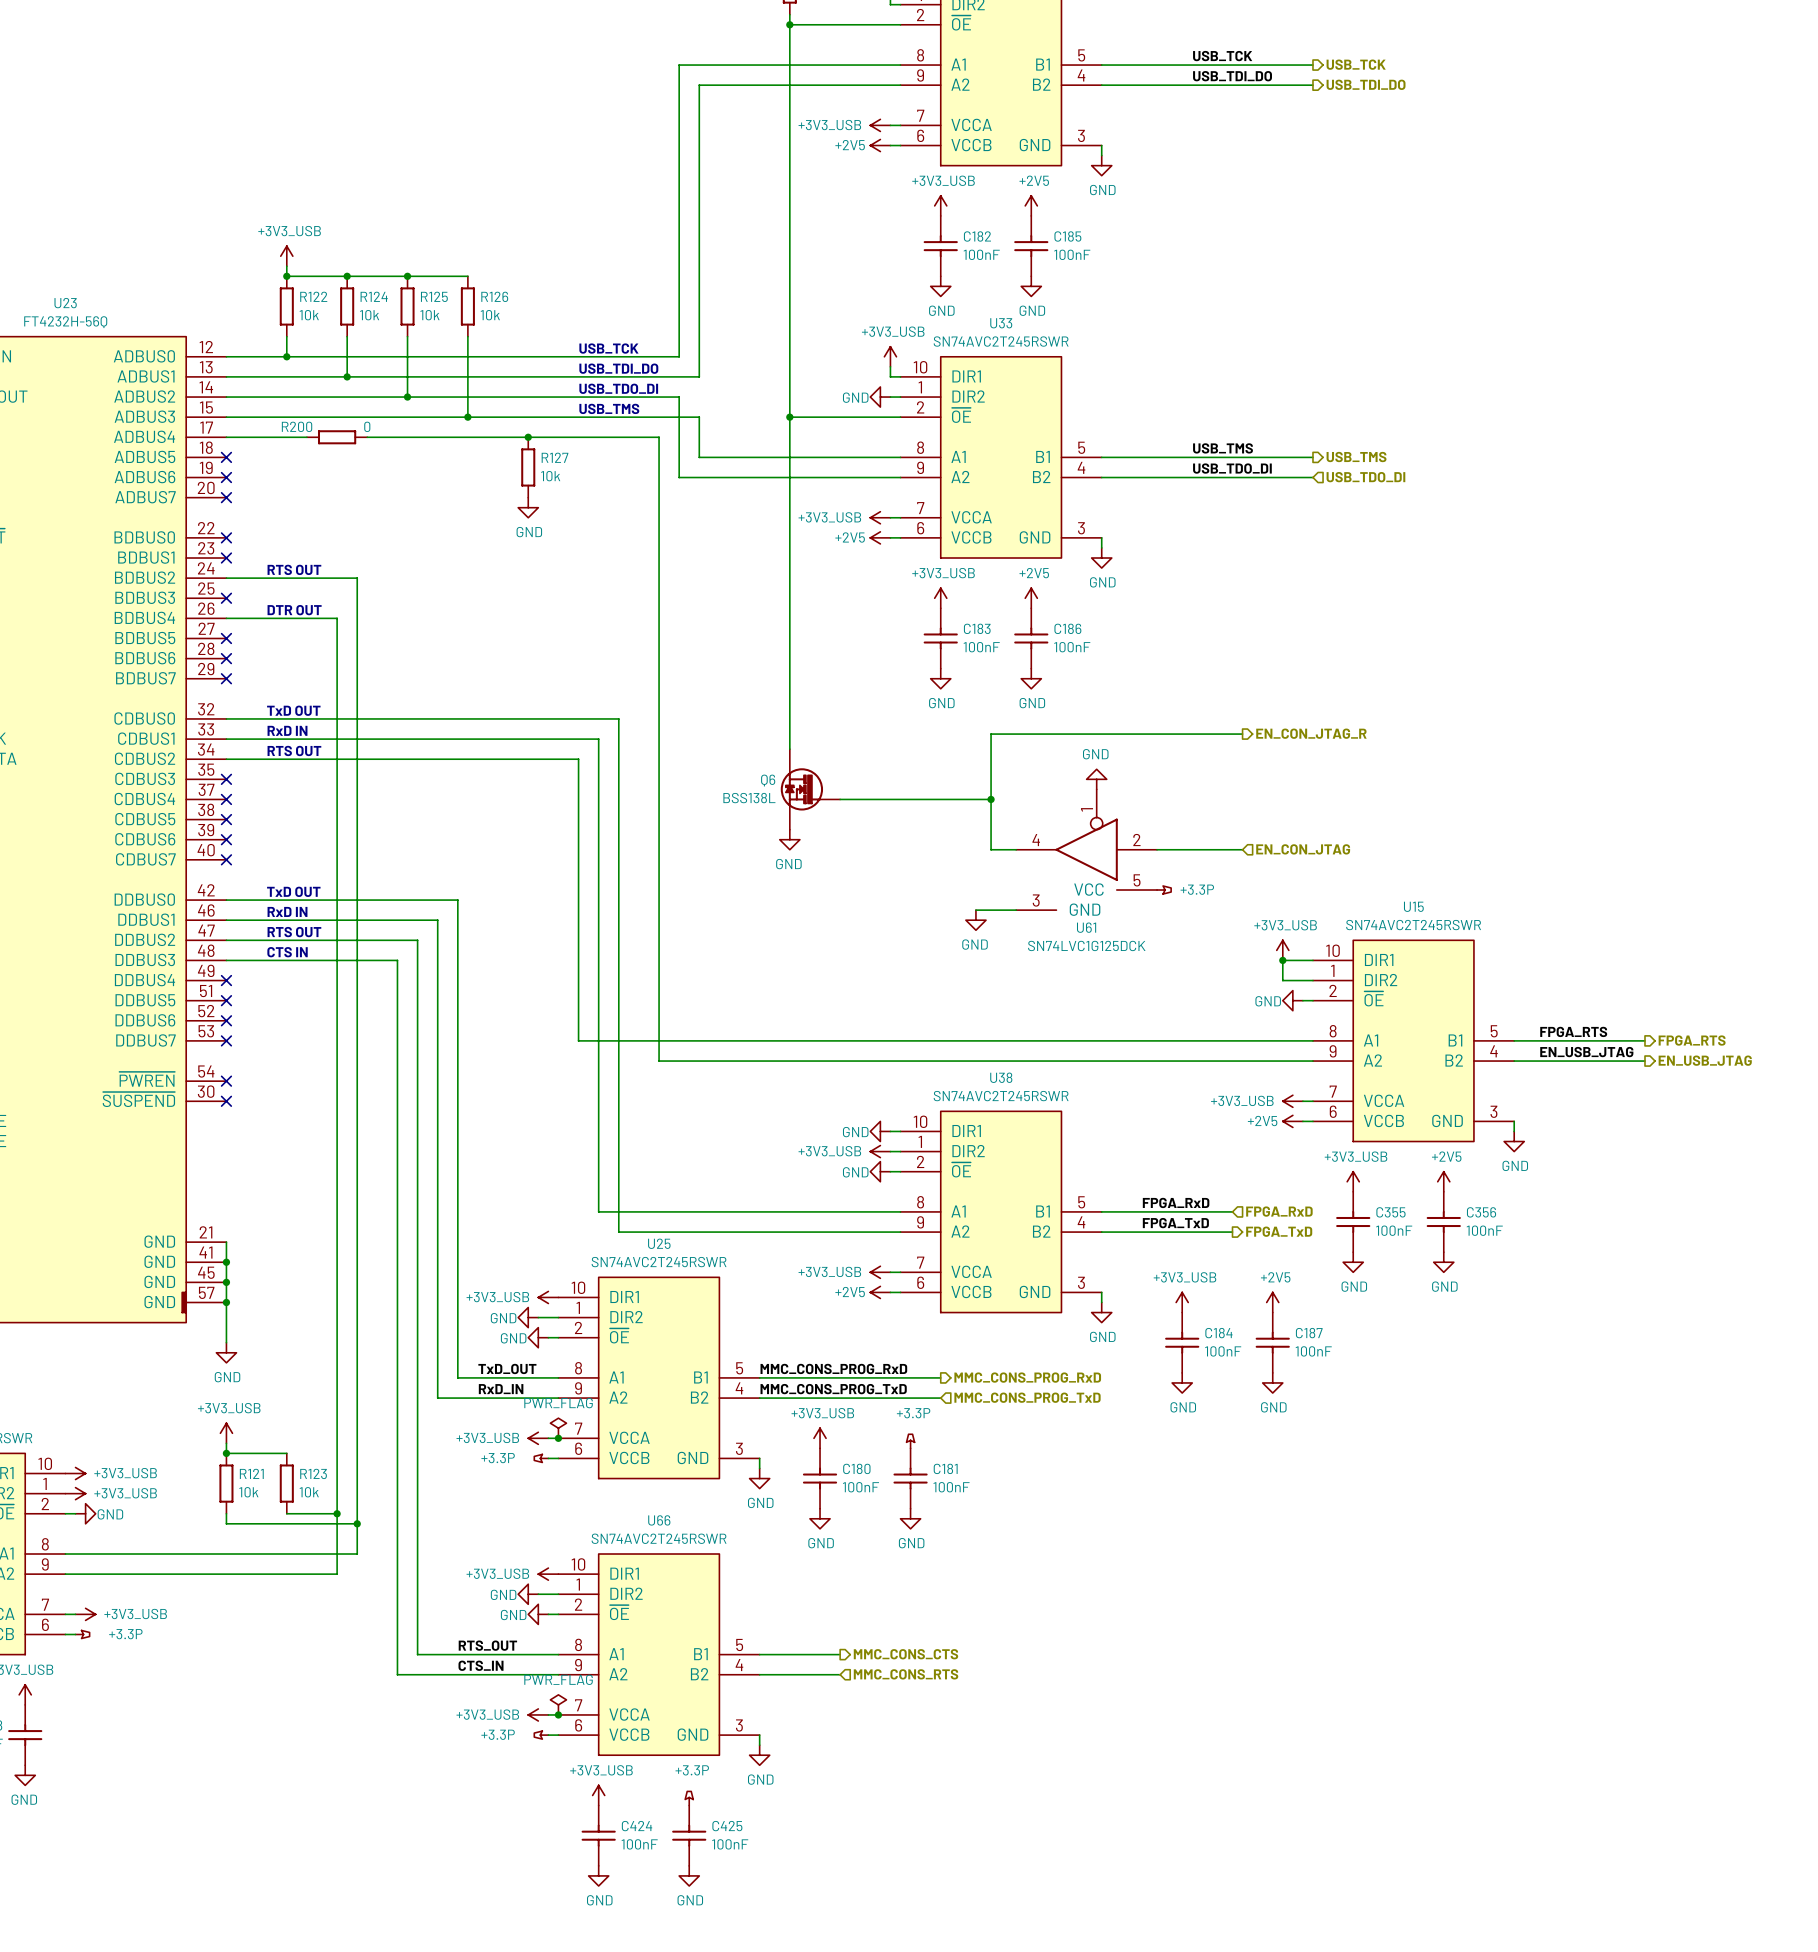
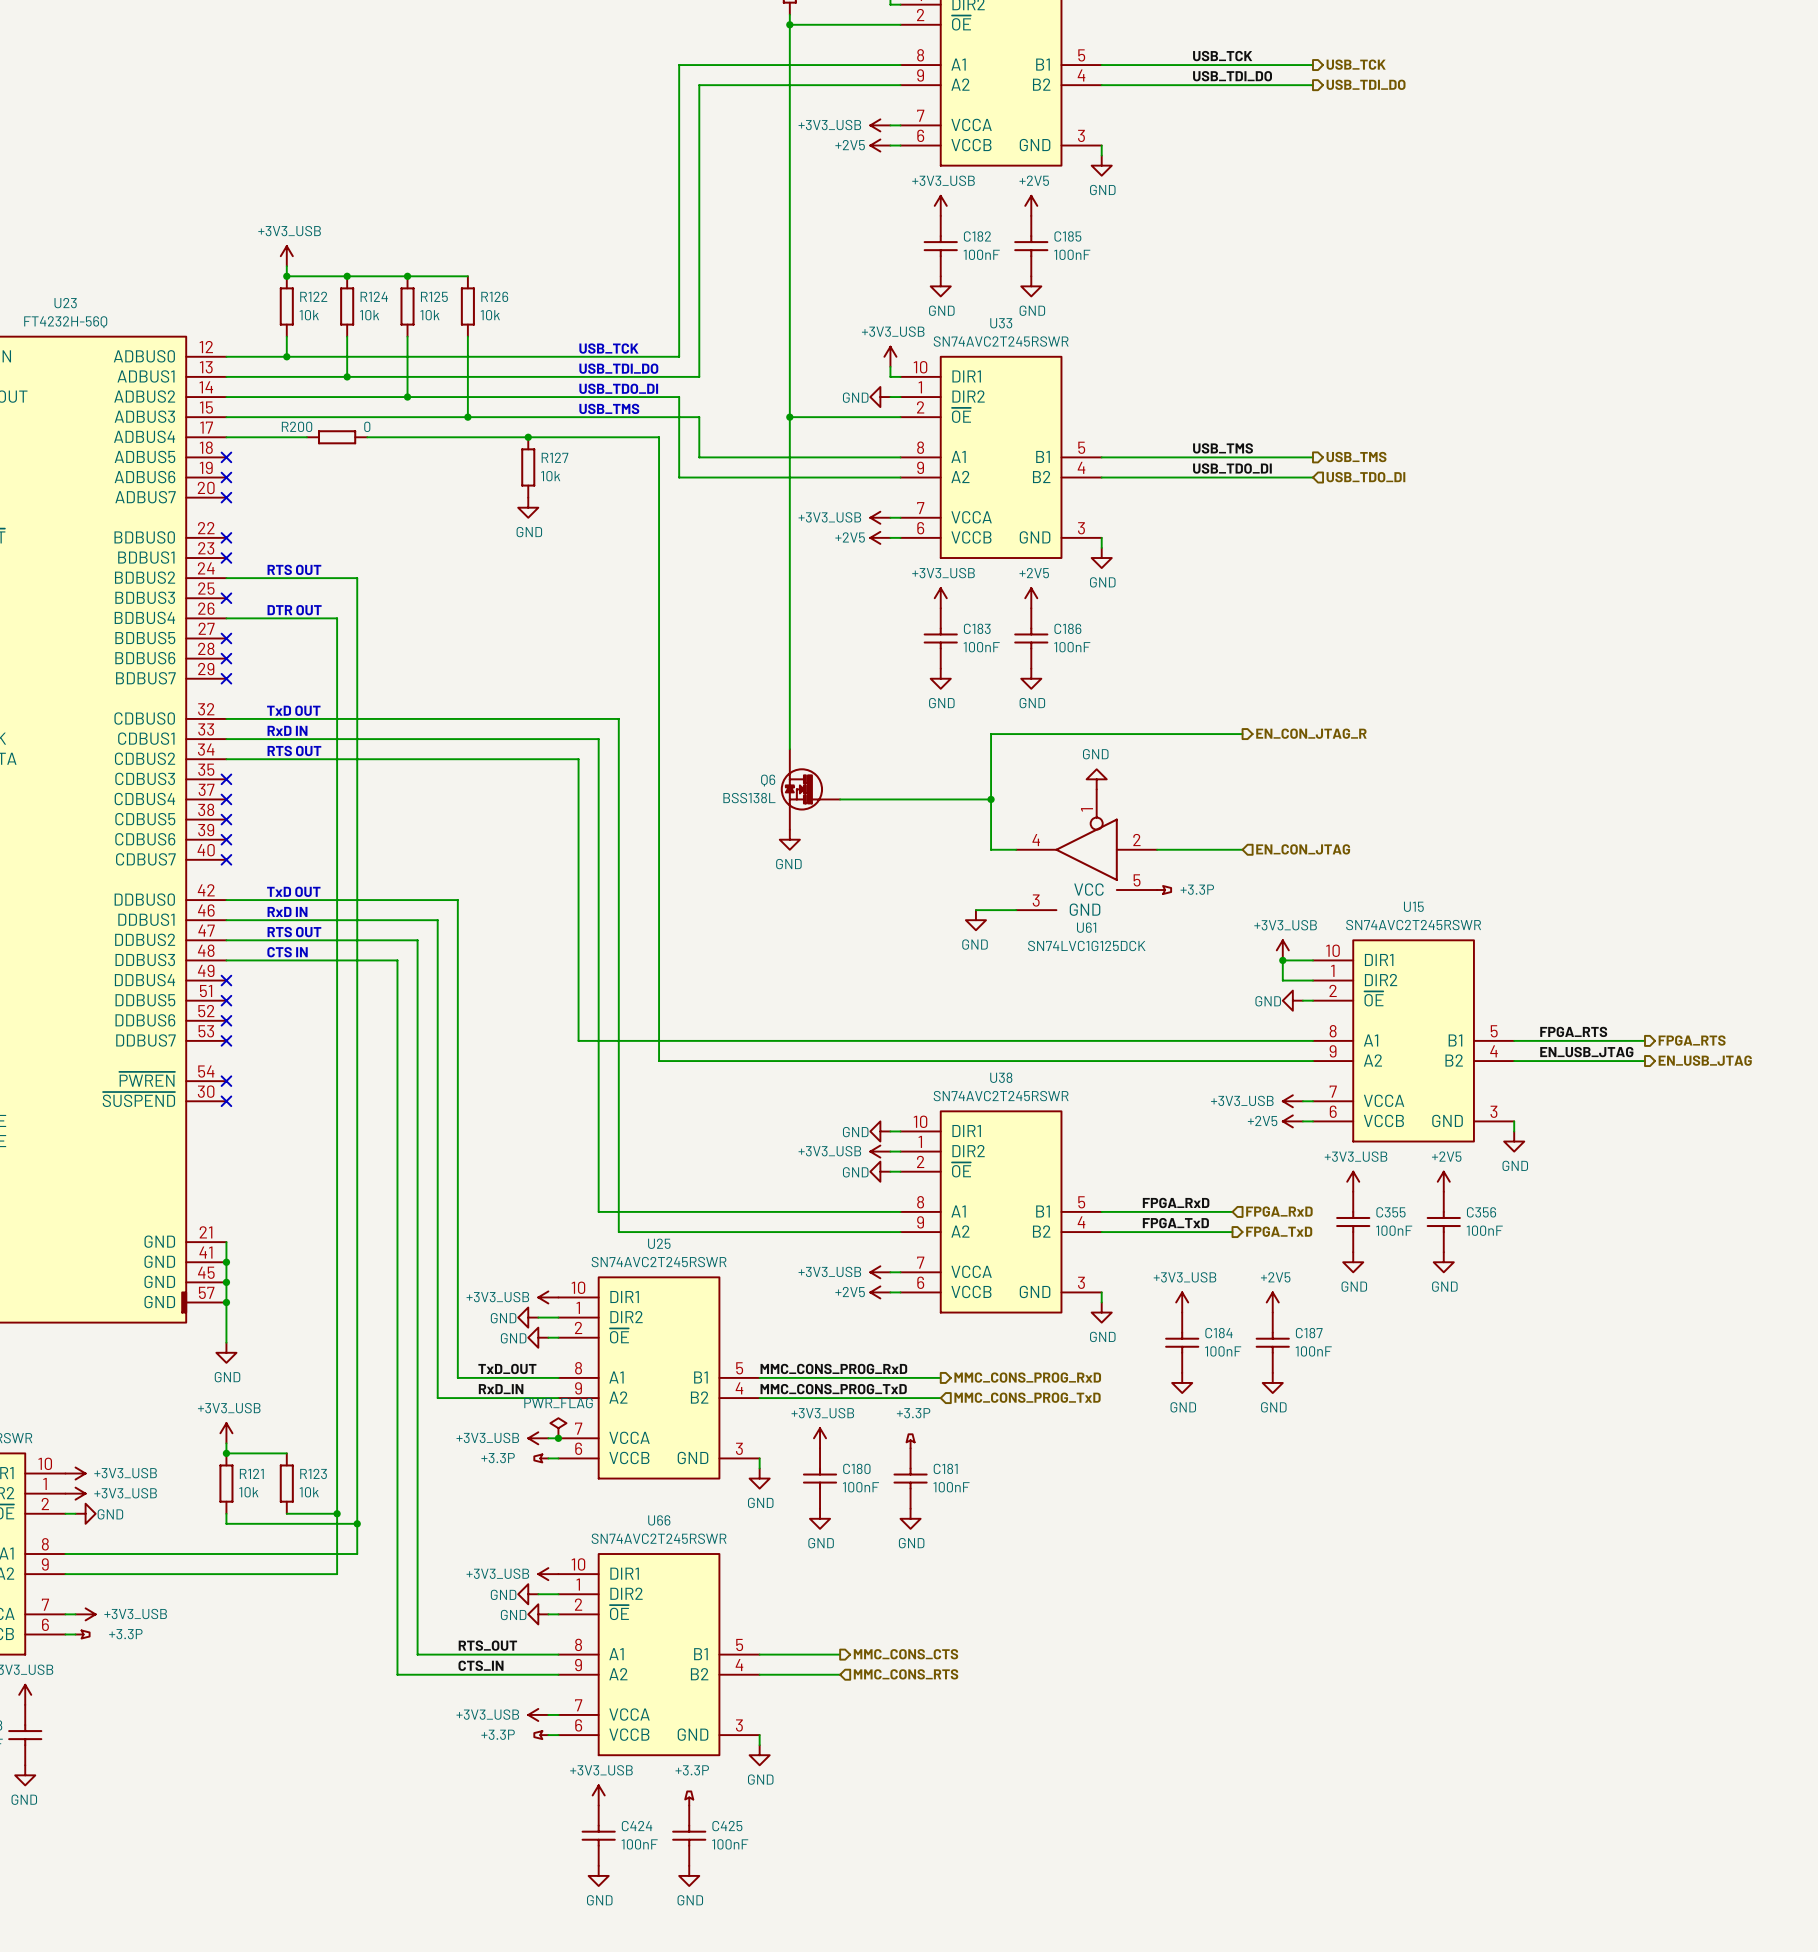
power symbol: PWR_FLAG (558, 1704) -> none
junction: (558, 1714) -> none

